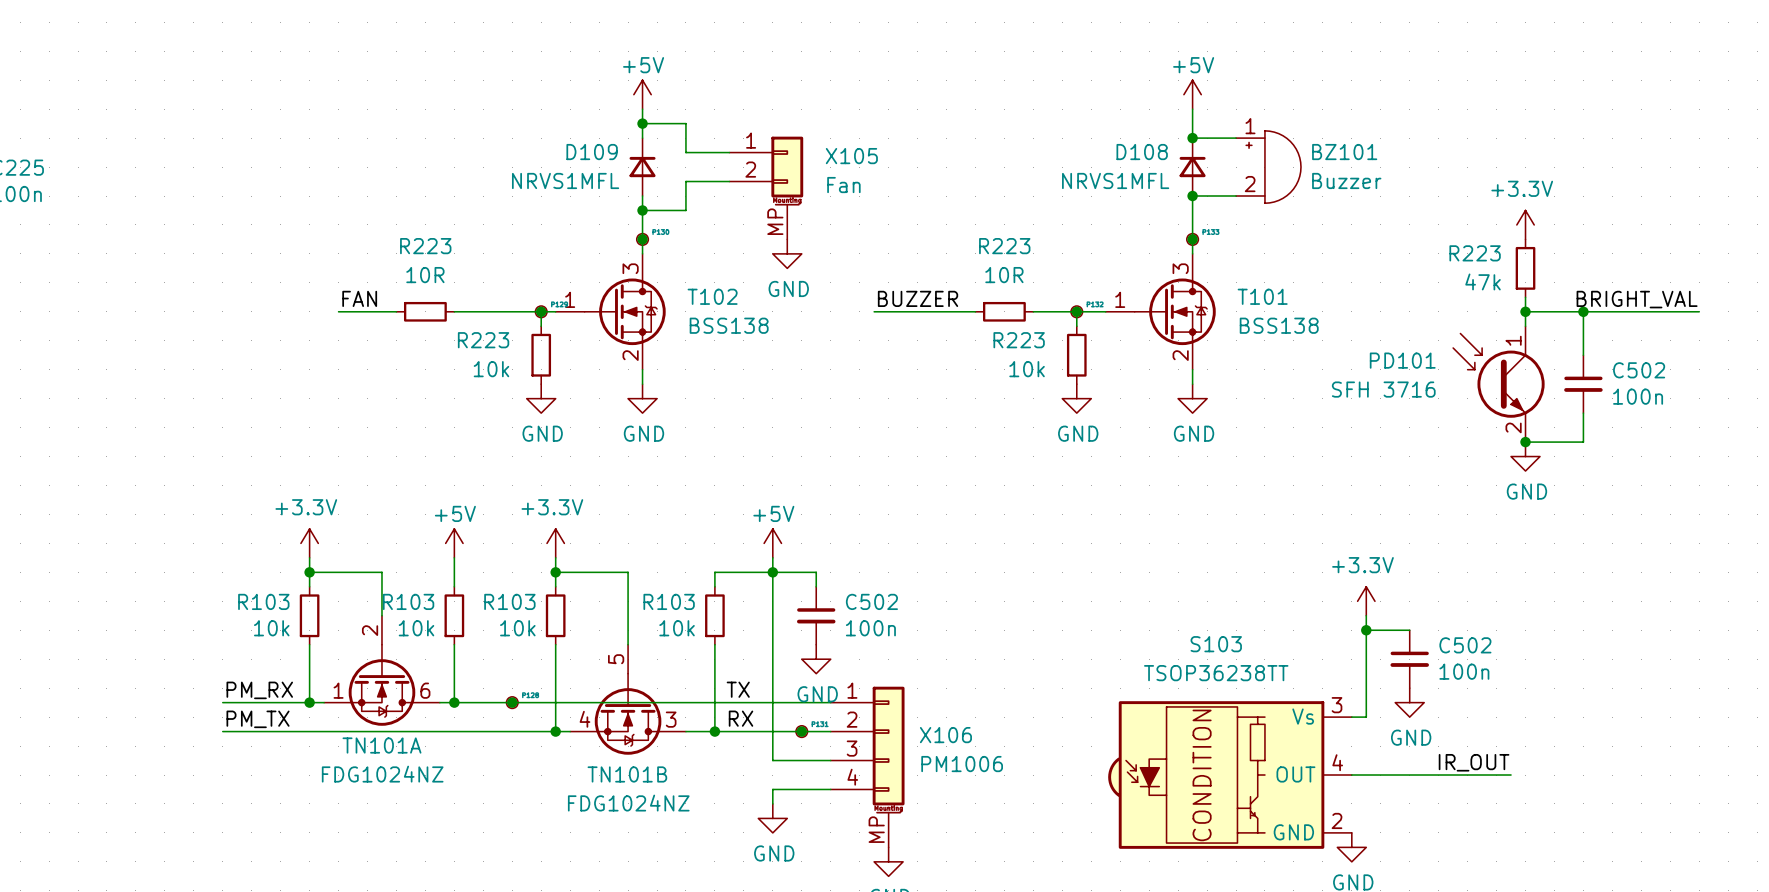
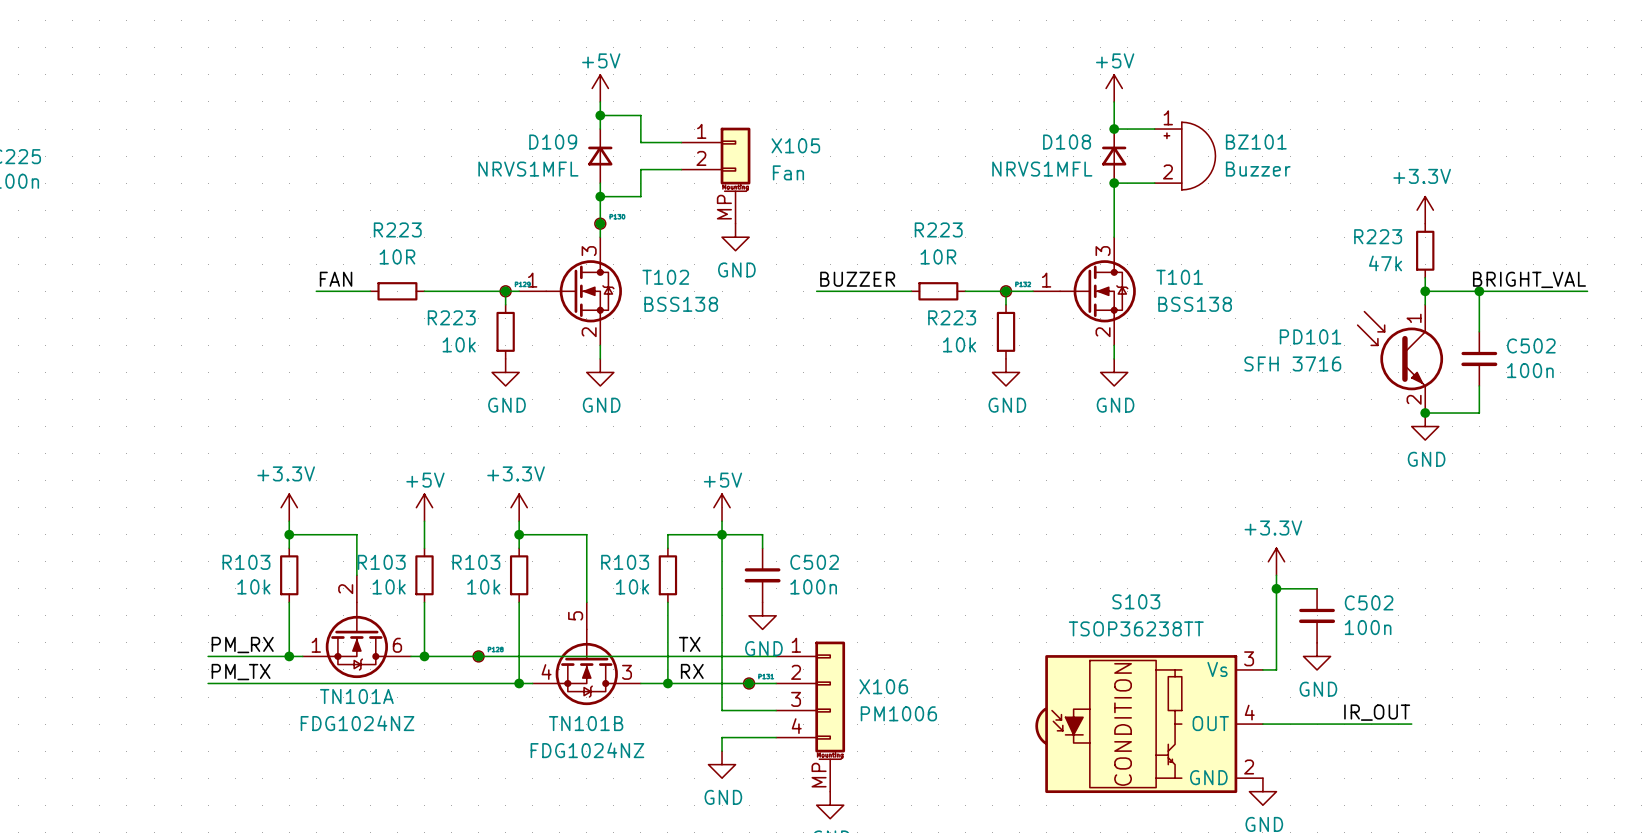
junction: (1192, 239) -> none
part: (1192, 239) -> none

